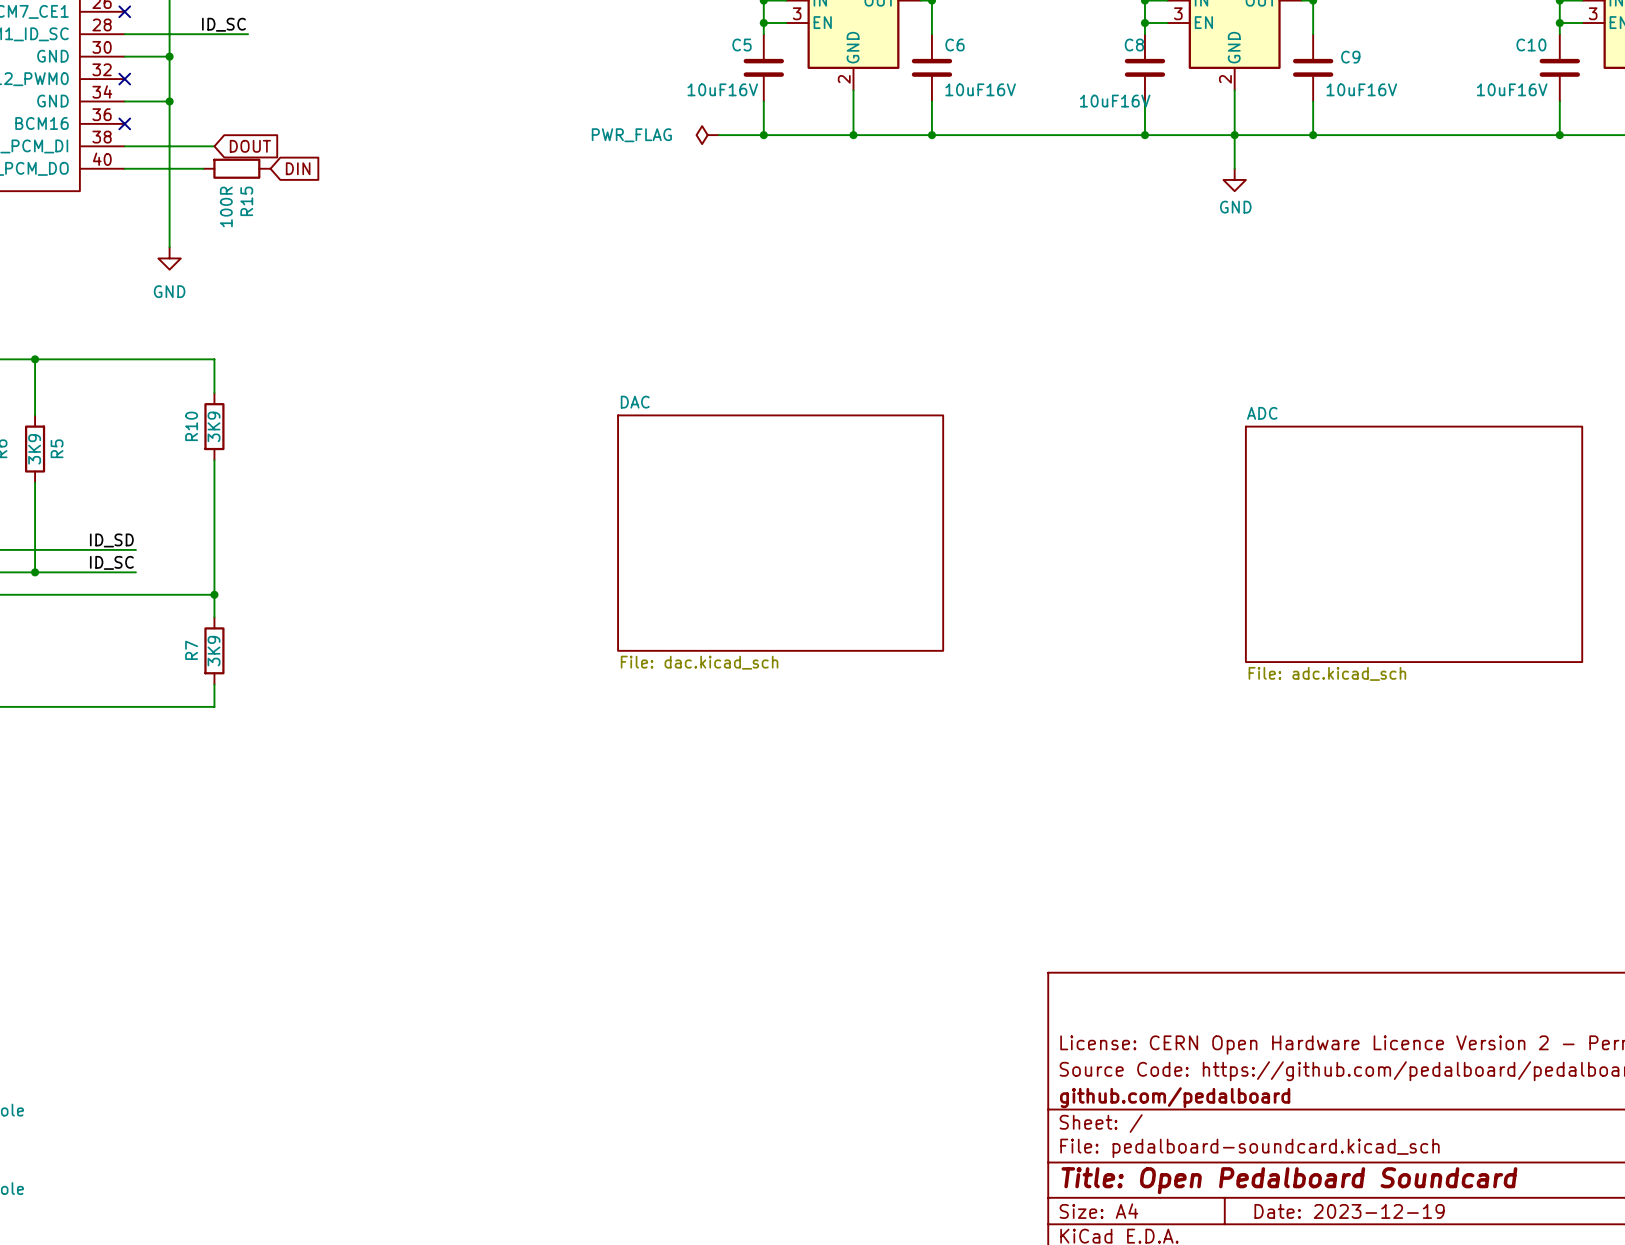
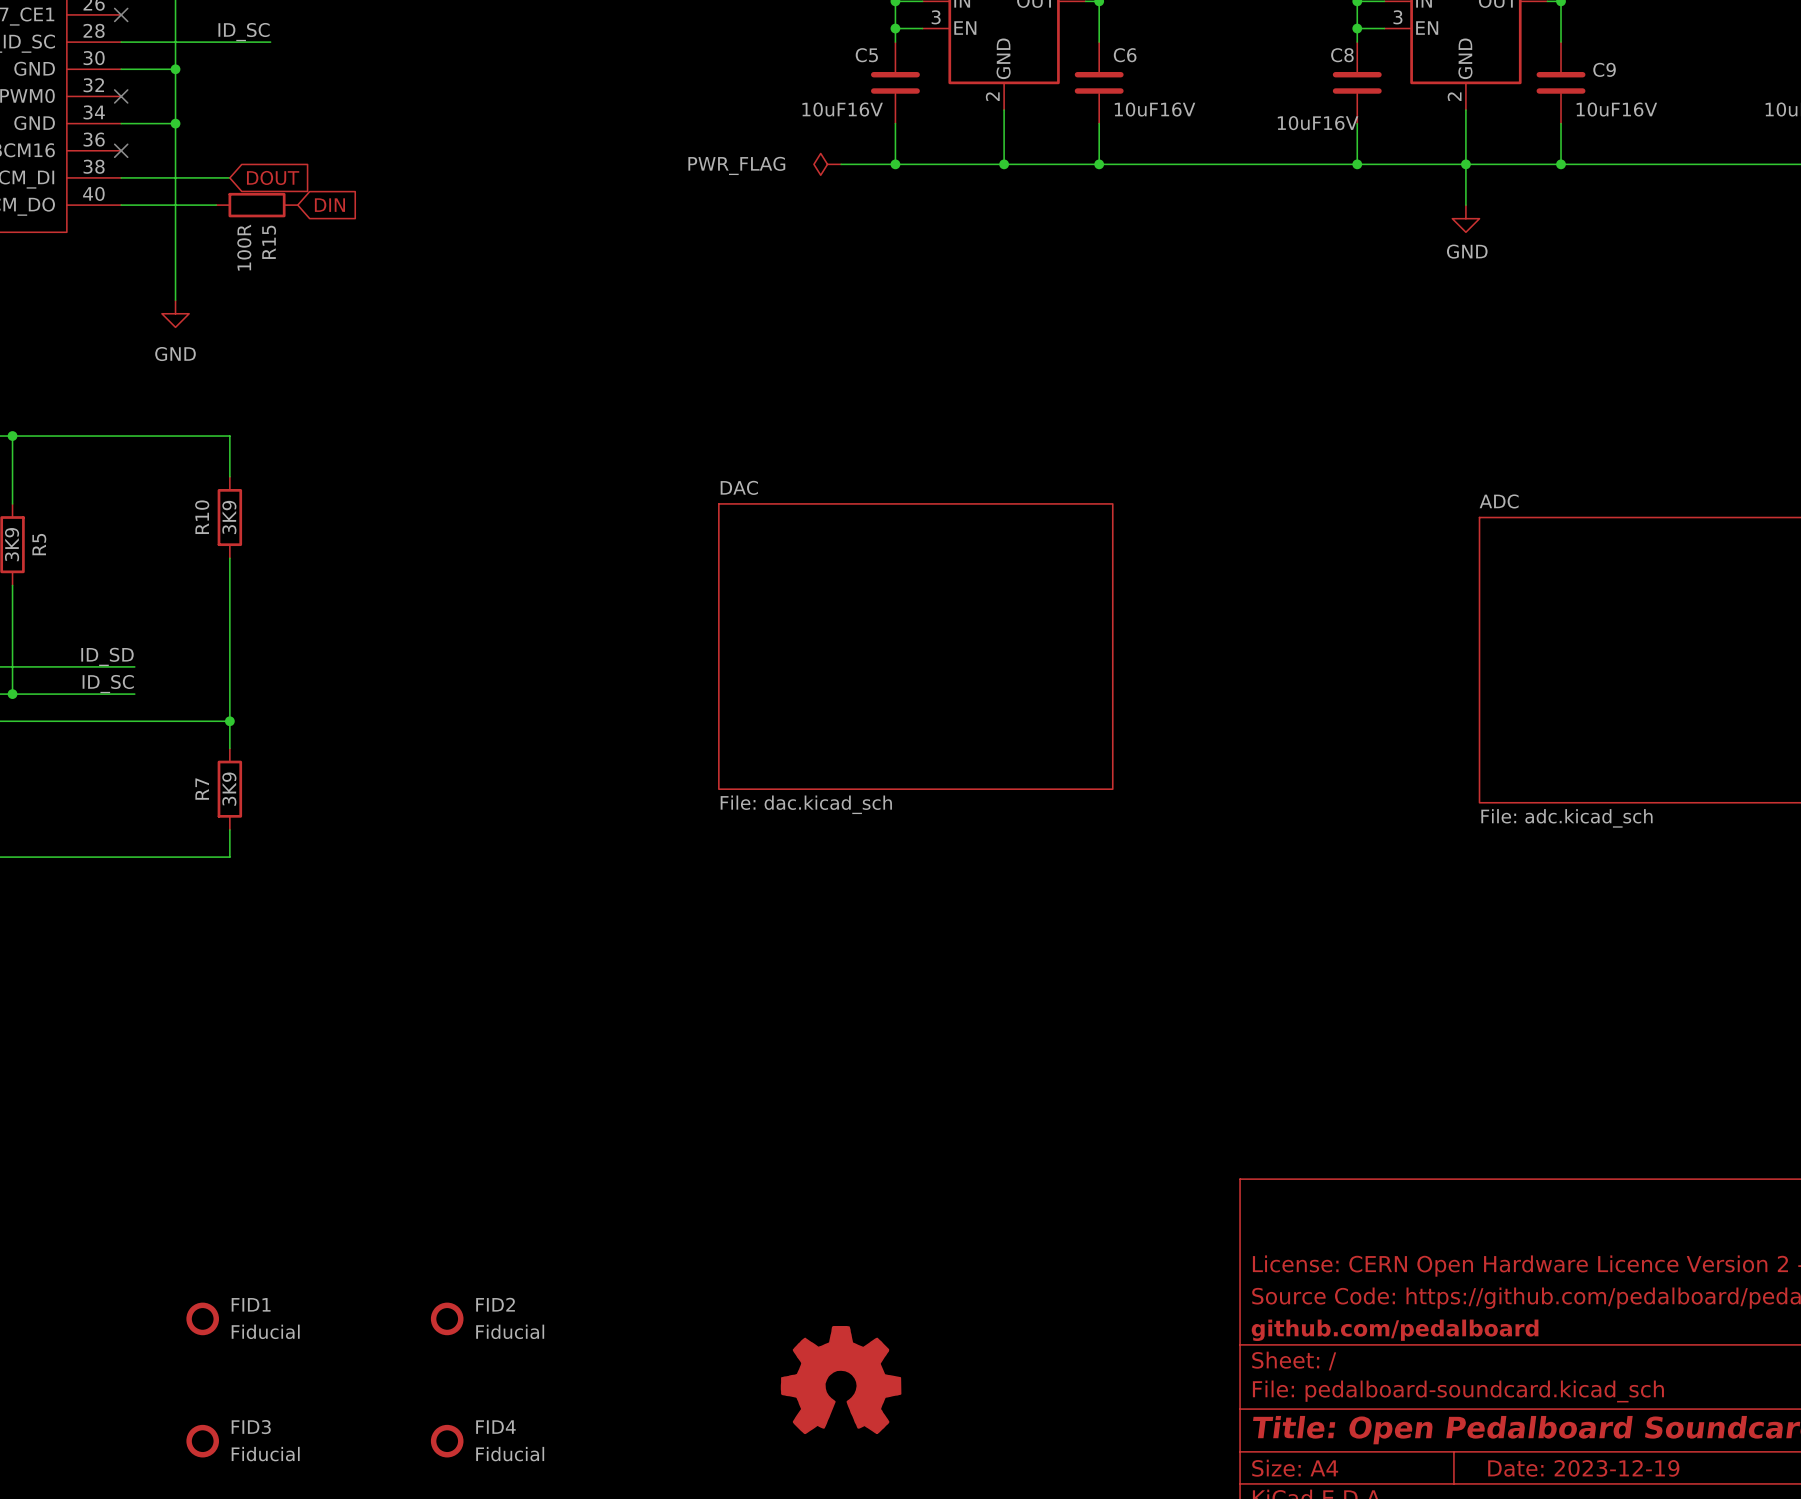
FID1: none -> Fiducial (202, 1318)
FID2: none -> Fiducial (447, 1318)
part: none -> (841, 1380)
FID3: none -> Fiducial (202, 1441)
FID4: none -> Fiducial (447, 1441)

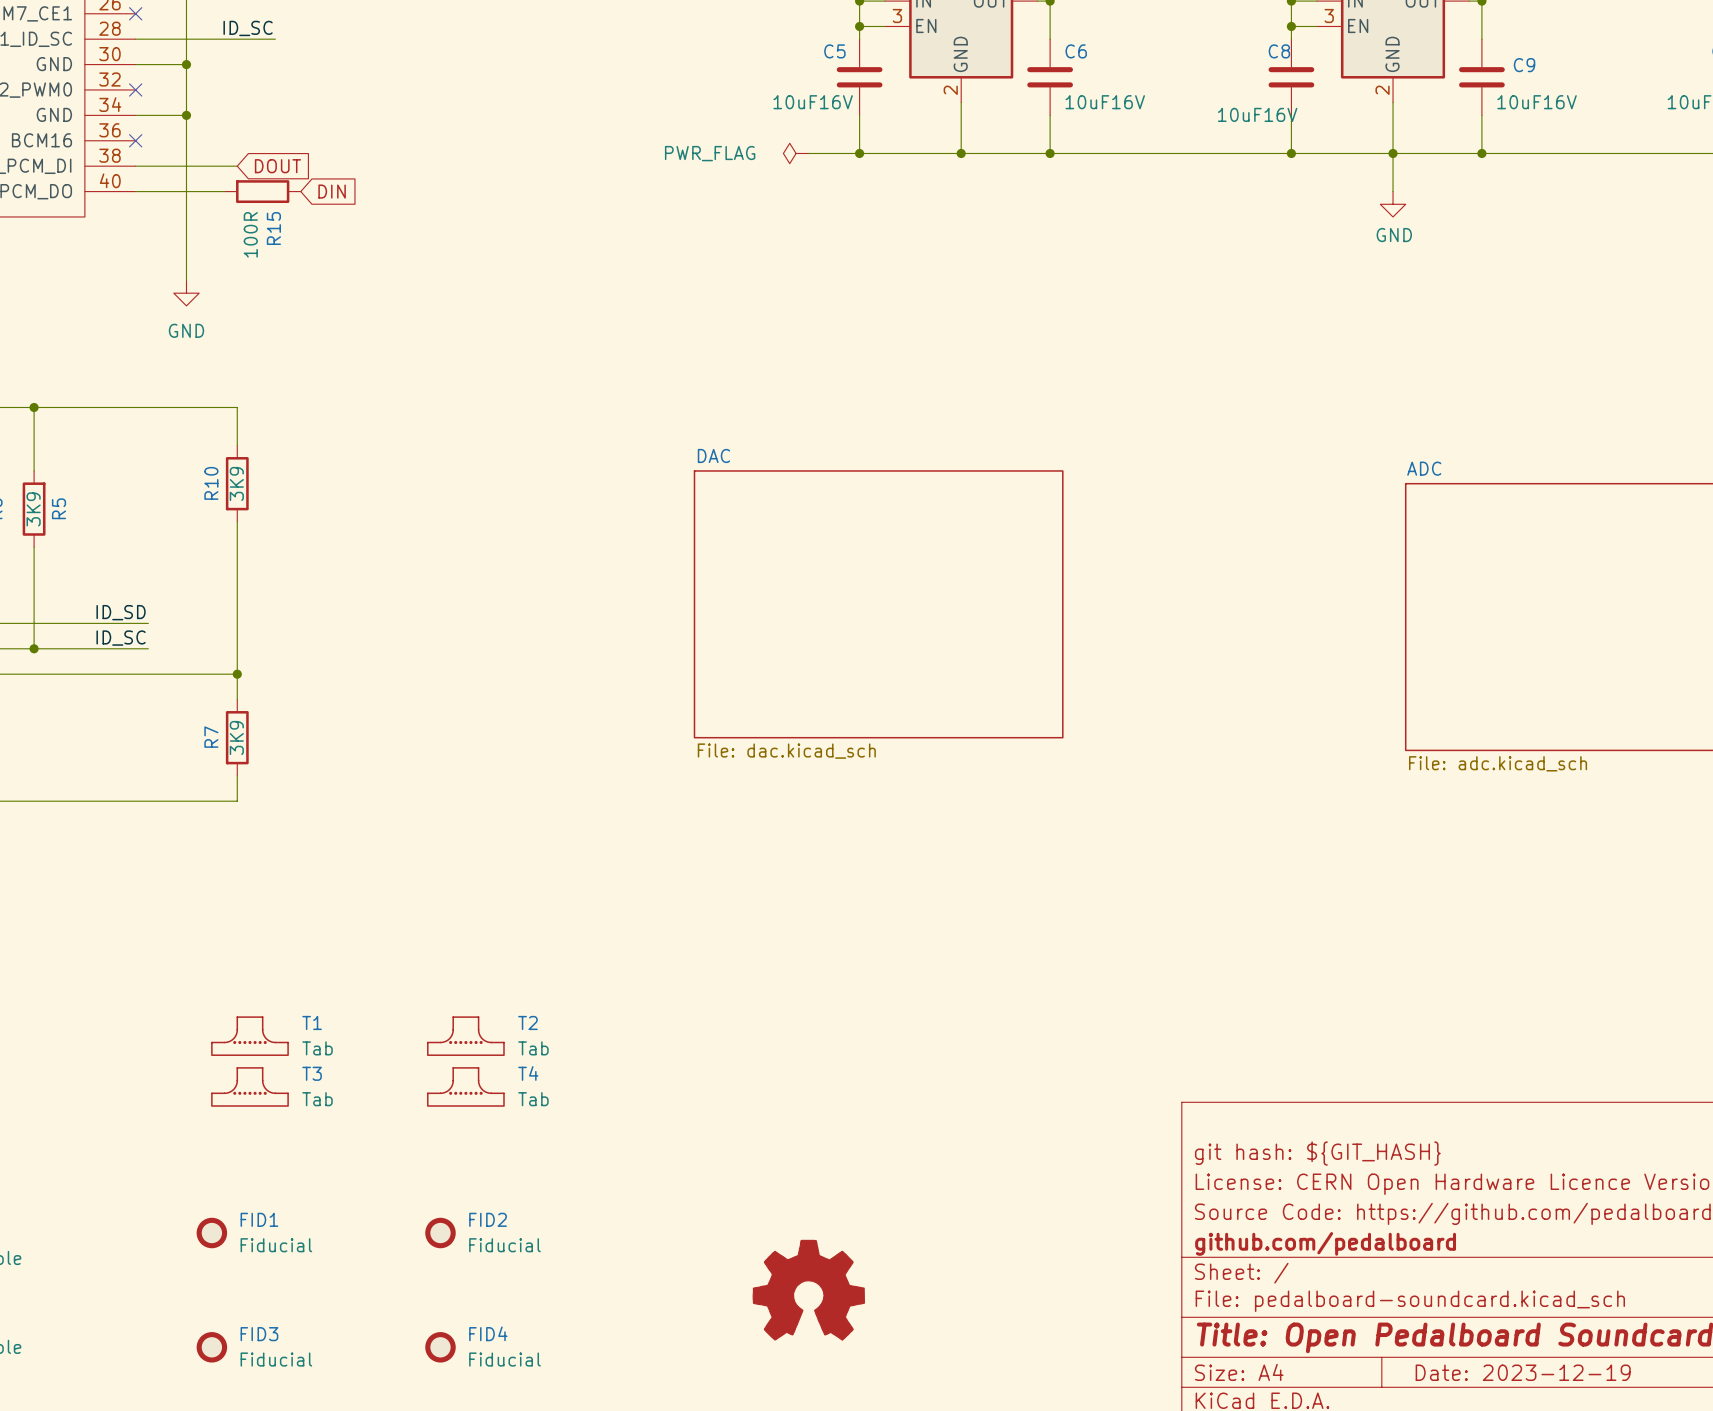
T1: none -> Tab (249, 1036)
T2: none -> Tab (465, 1036)
T3: none -> Tab (249, 1086)
T4: none -> Tab (465, 1086)
title block: none -> git hash: ${GIT_HASH} (1317, 1153)

